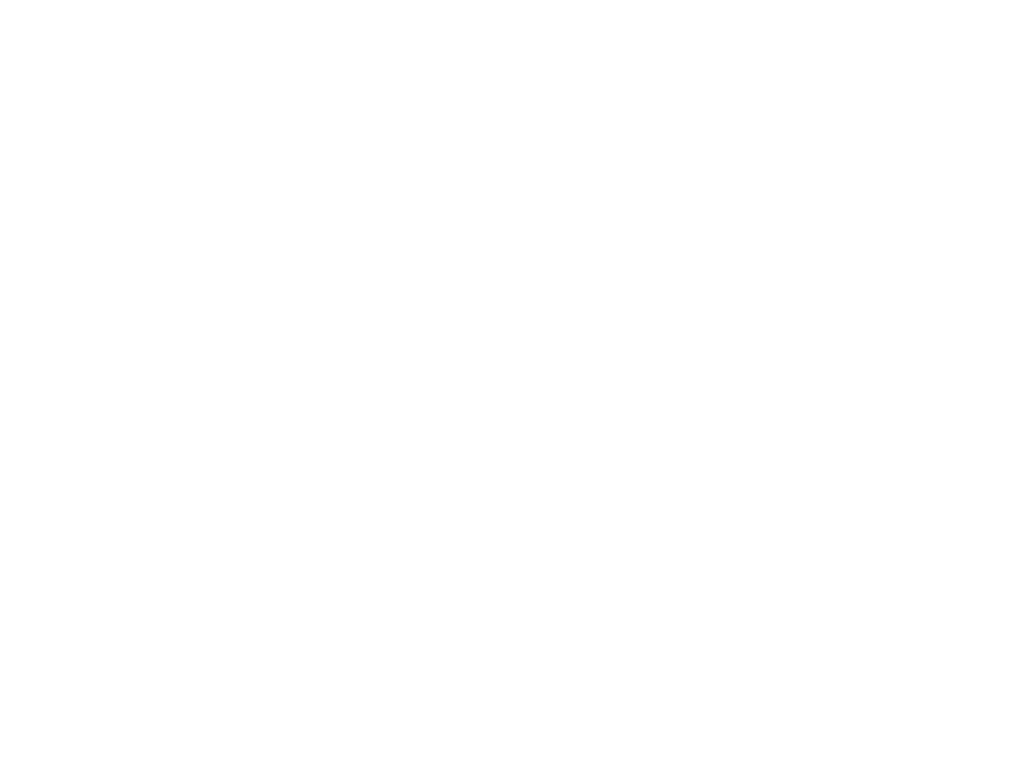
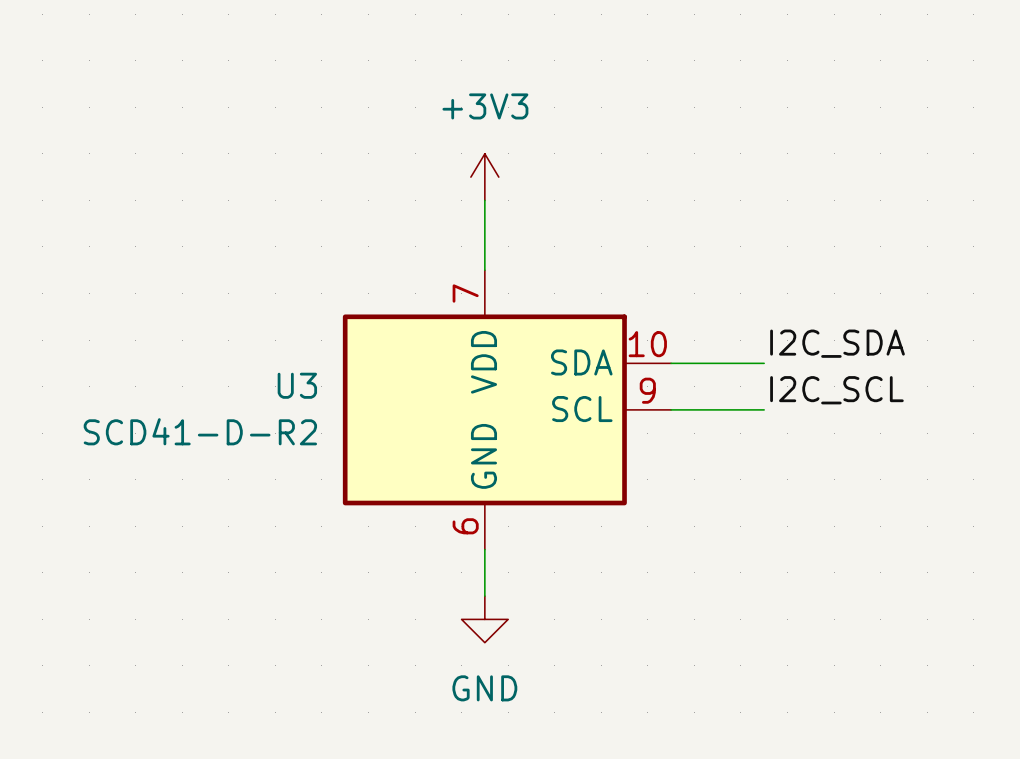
power symbol: none -> +3V3 (484, 177)
wire: none -> (484, 200) (484, 270)
label: none -> I2C_SDA (837, 343)
wire: none -> (671, 363) (764, 363)
label: none -> I2C_SCL (836, 390)
U3: none -> SCD41-D-R2 (506, 409)
wire: none -> (671, 409) (764, 409)
wire: none -> (484, 549) (484, 596)
power symbol: none -> GND (484, 619)

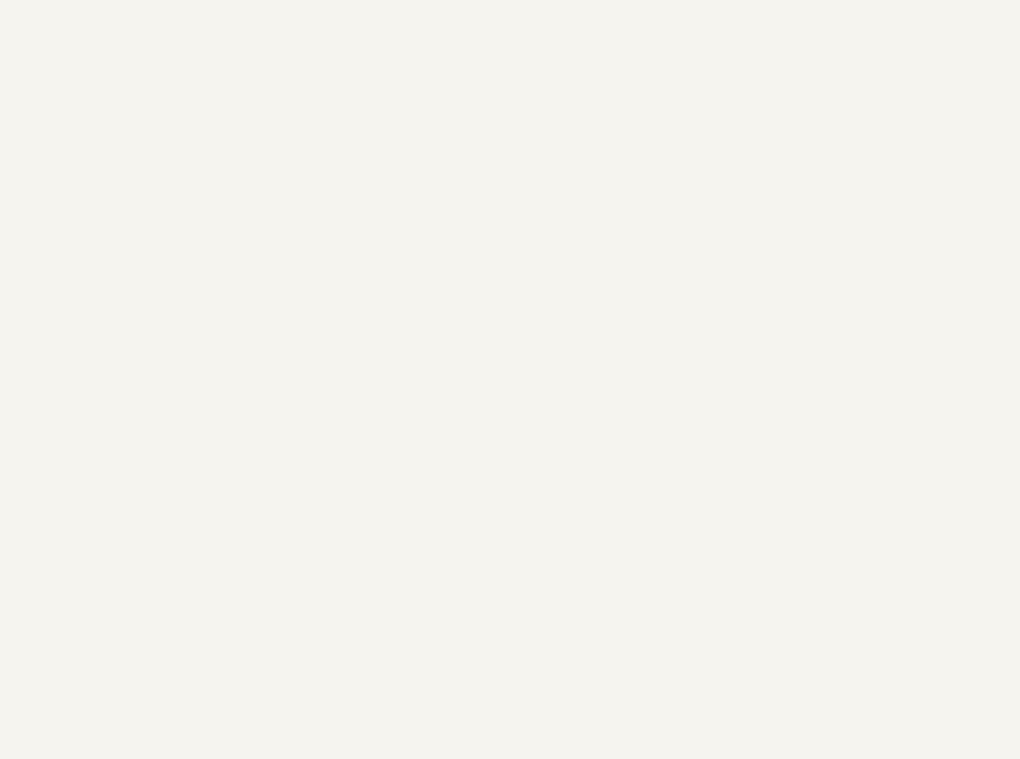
power symbol: +3V3 (484, 177) -> none
wire: (484, 200) (484, 270) -> none
label: I2C_SDA (837, 343) -> none
wire: (671, 363) (764, 363) -> none
label: I2C_SCL (836, 390) -> none
U3: SCD41-D-R2 (506, 409) -> none
wire: (671, 409) (764, 409) -> none
wire: (484, 549) (484, 596) -> none
power symbol: GND (484, 619) -> none

